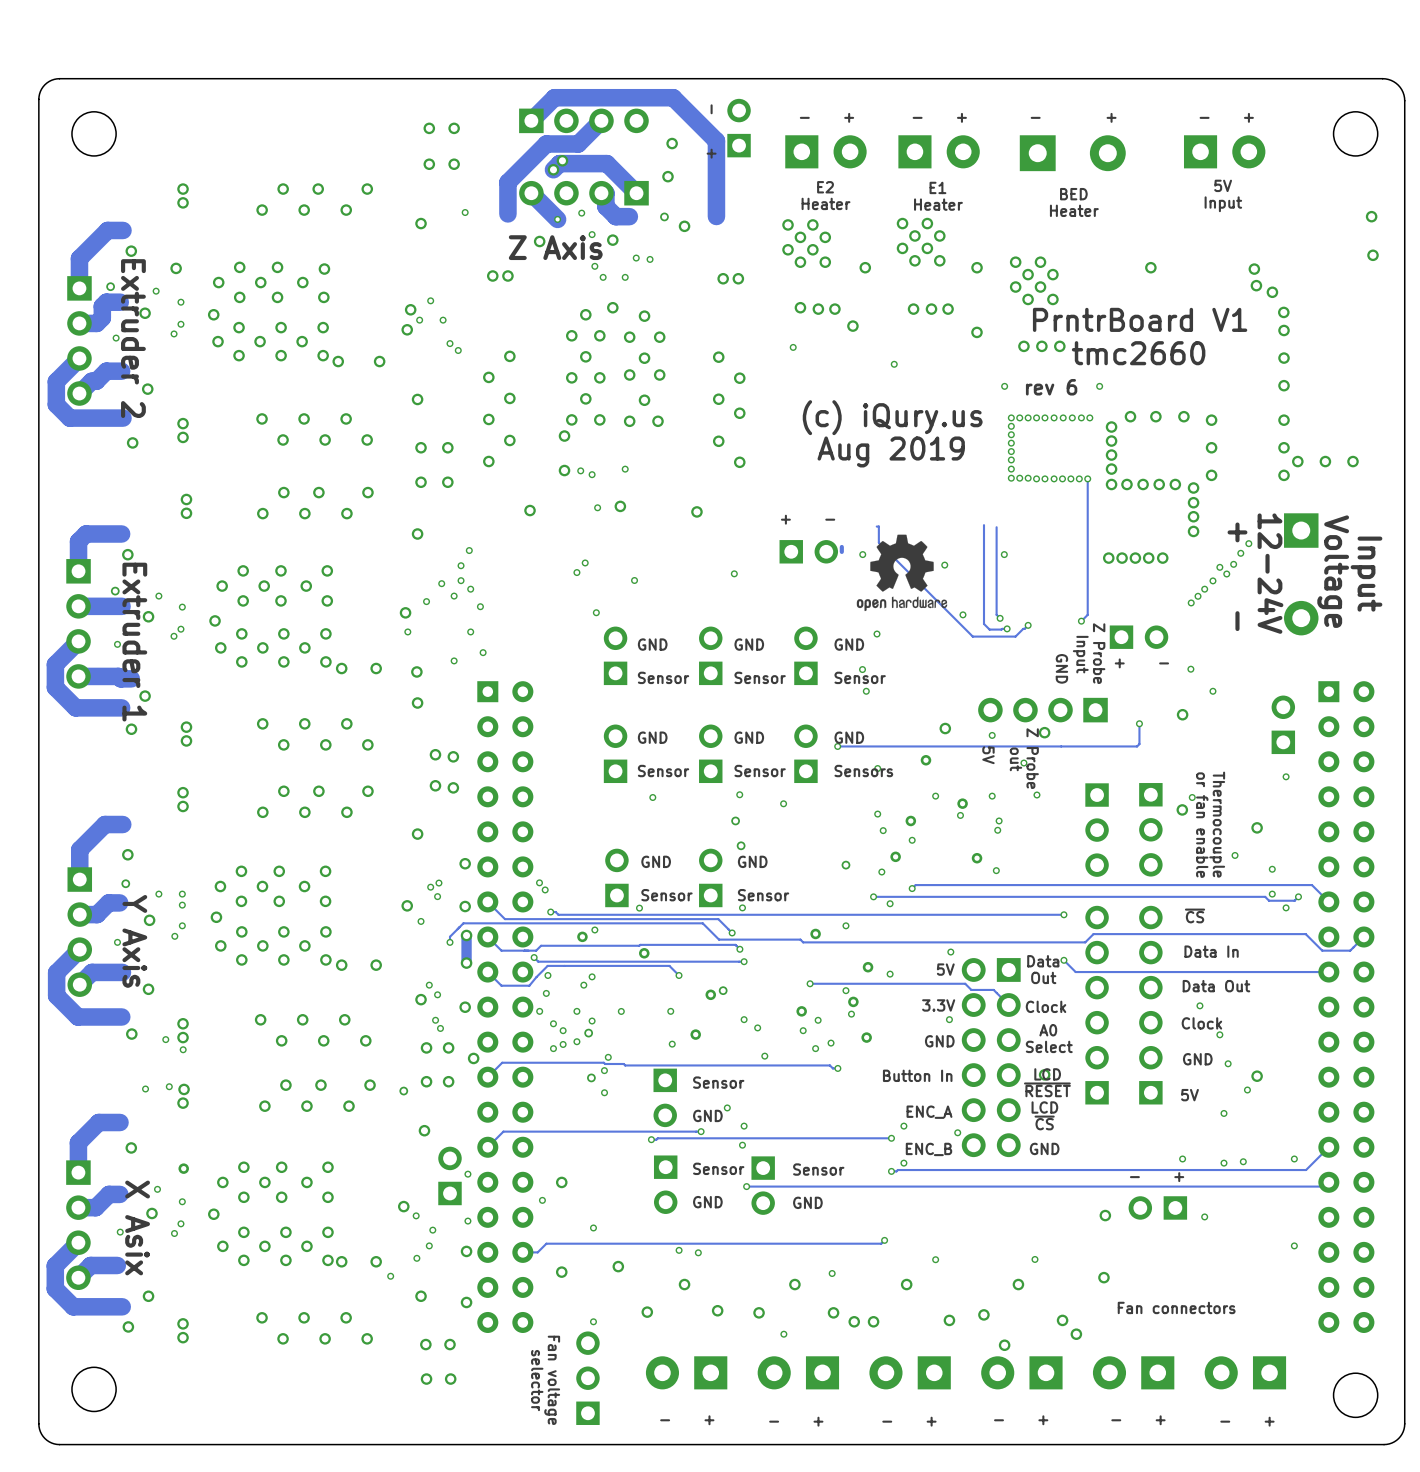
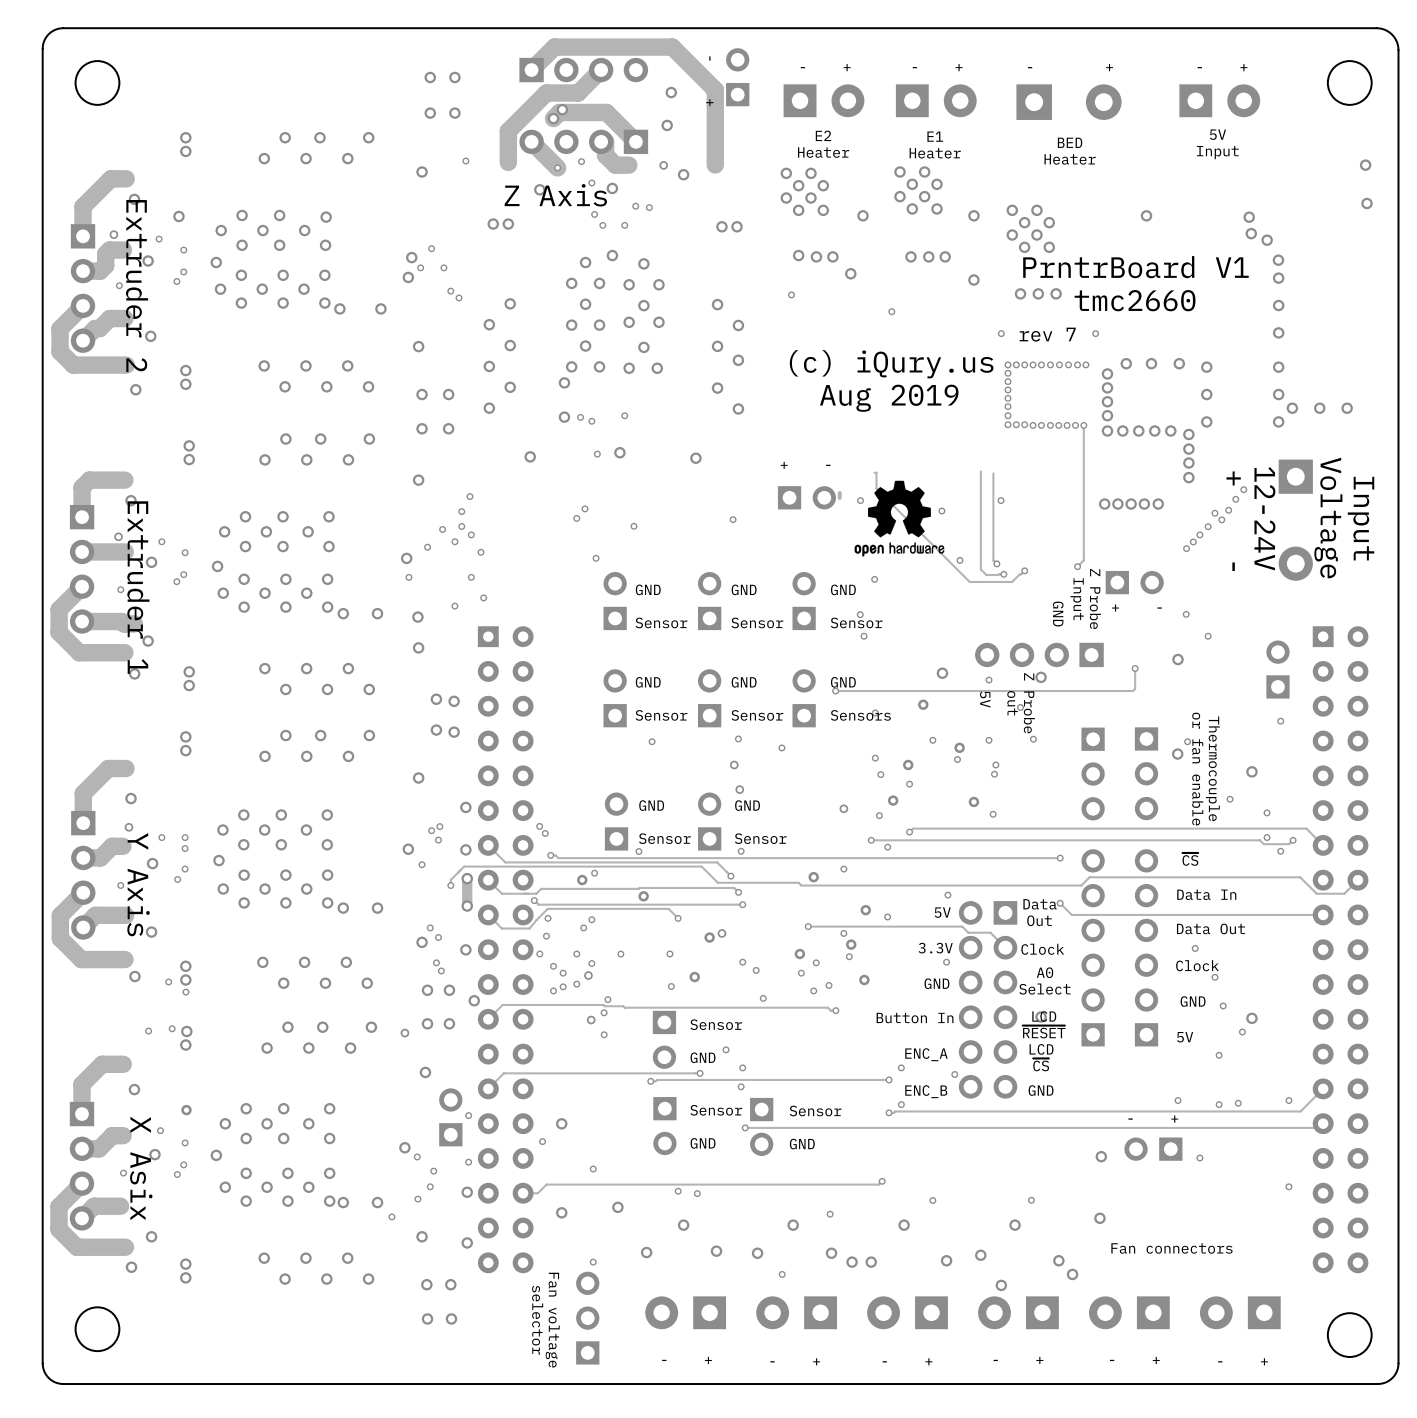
text: rev 6 (1051, 387) -> rev 7 (1047, 334)

